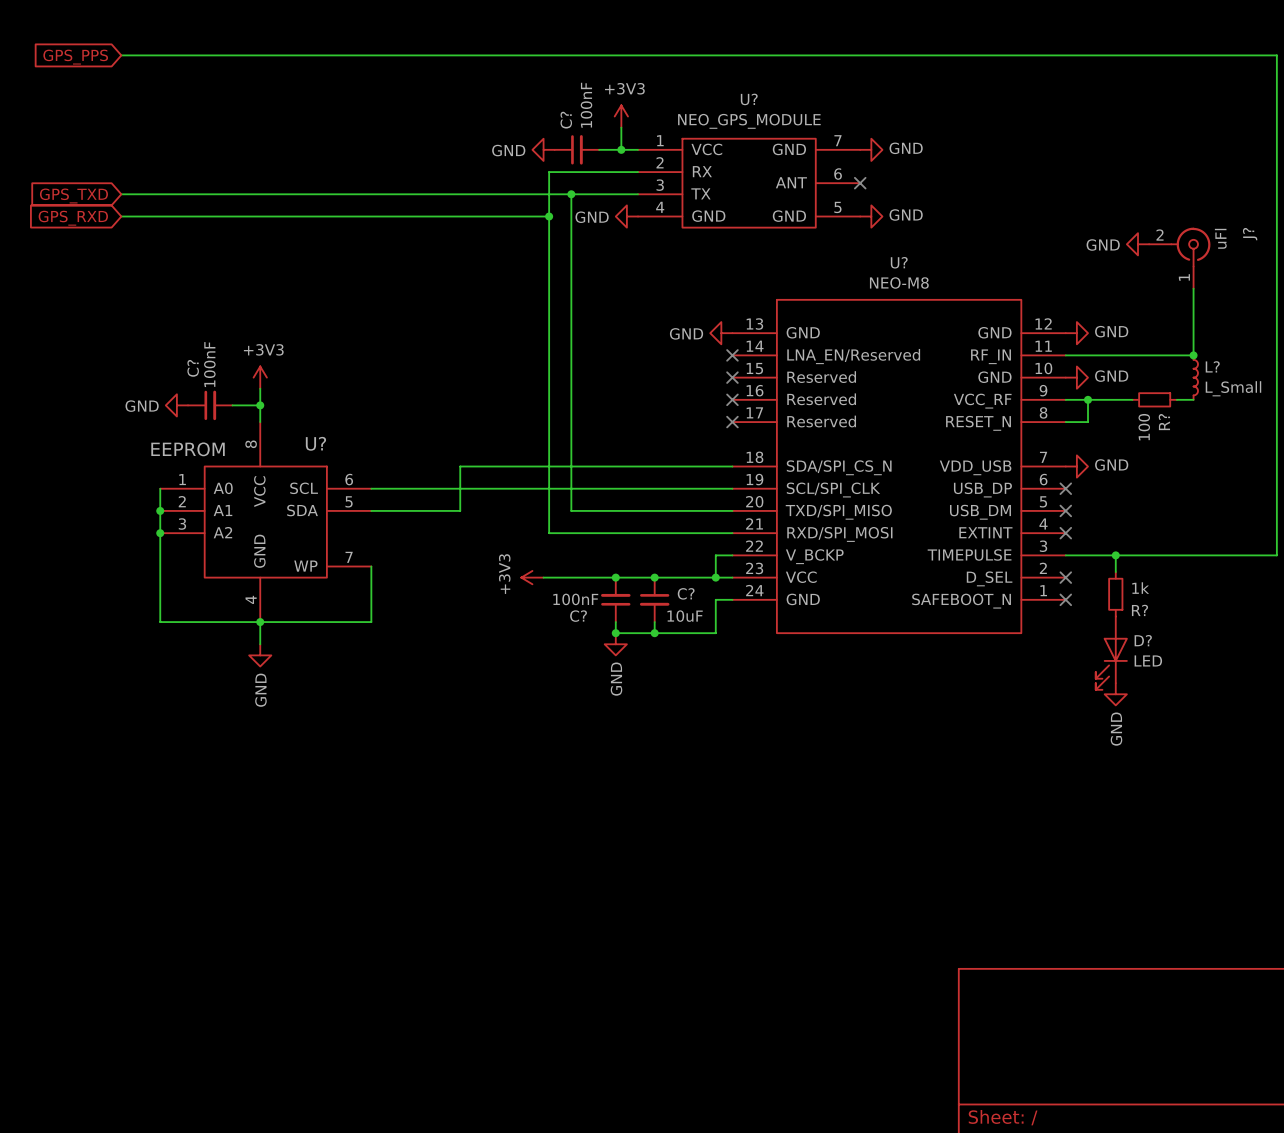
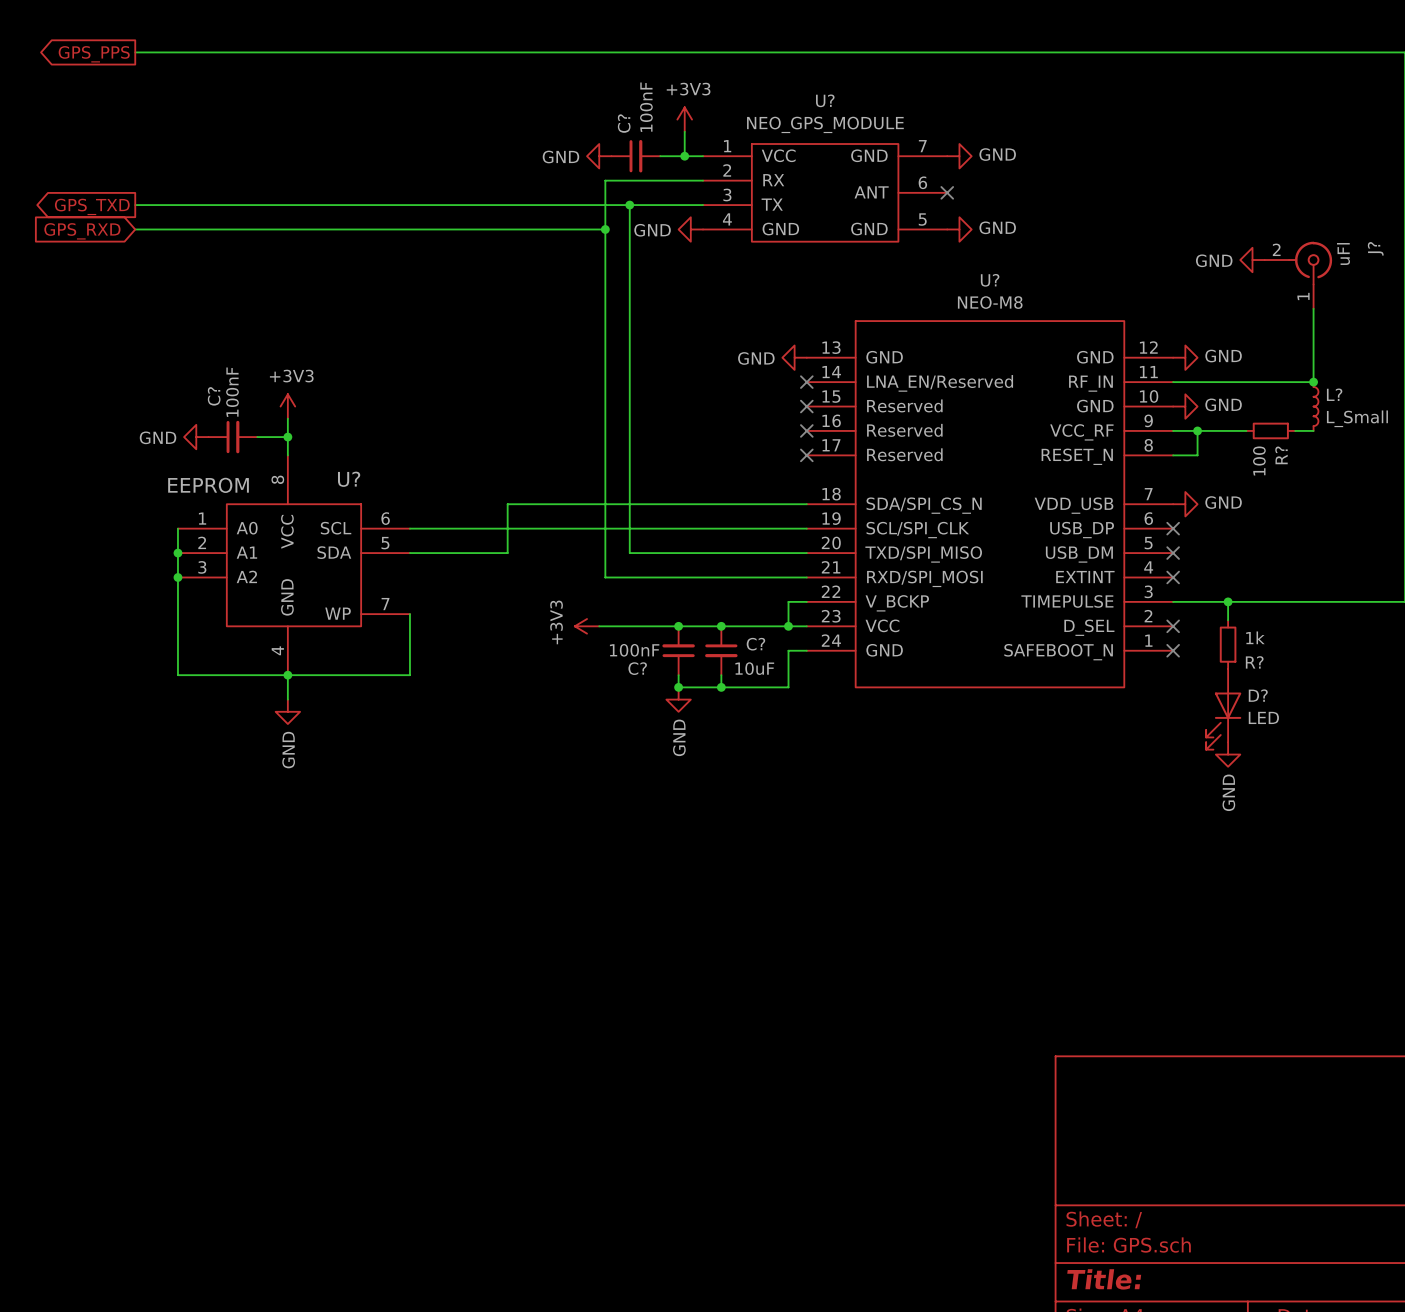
global label shape: input (75, 57) -> output (94, 54)
global label shape: input (73, 195) -> output (92, 206)

